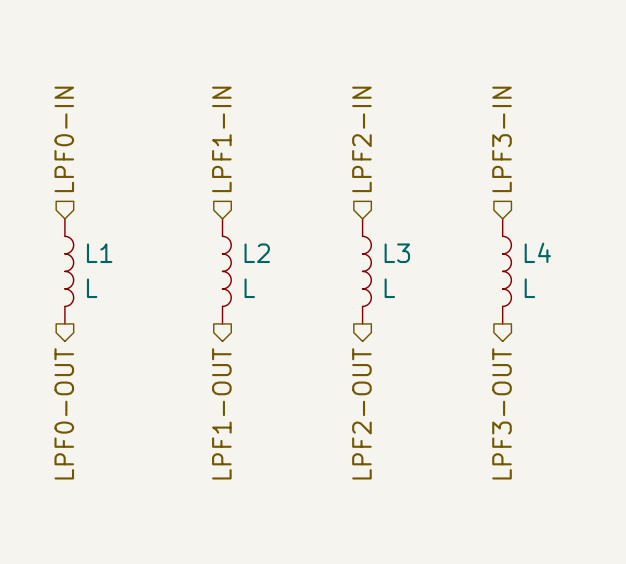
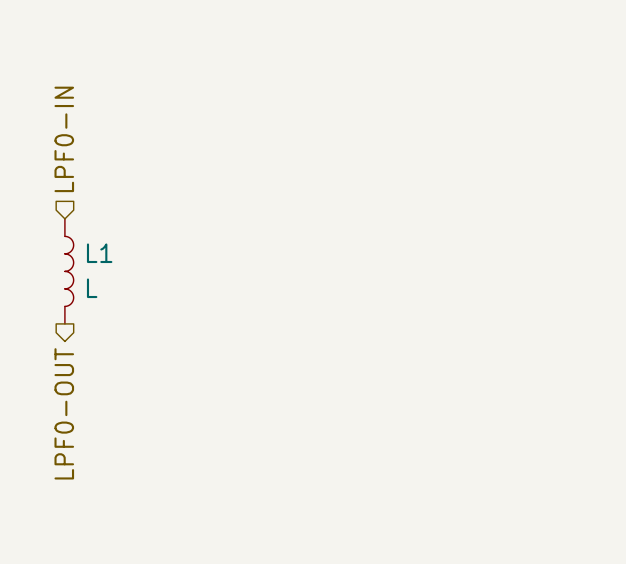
hierarchical label: LPF1-IN (221, 139) -> none
hierarchical label: LPF2-IN (361, 139) -> none
hierarchical label: LPF3-IN (502, 139) -> none
L2: L (226, 271) -> none
L3: L (366, 271) -> none
L4: L (507, 271) -> none
hierarchical label: LPF1-OUT (221, 413) -> none
hierarchical label: LPF2-OUT (361, 413) -> none
hierarchical label: LPF3-OUT (502, 413) -> none

